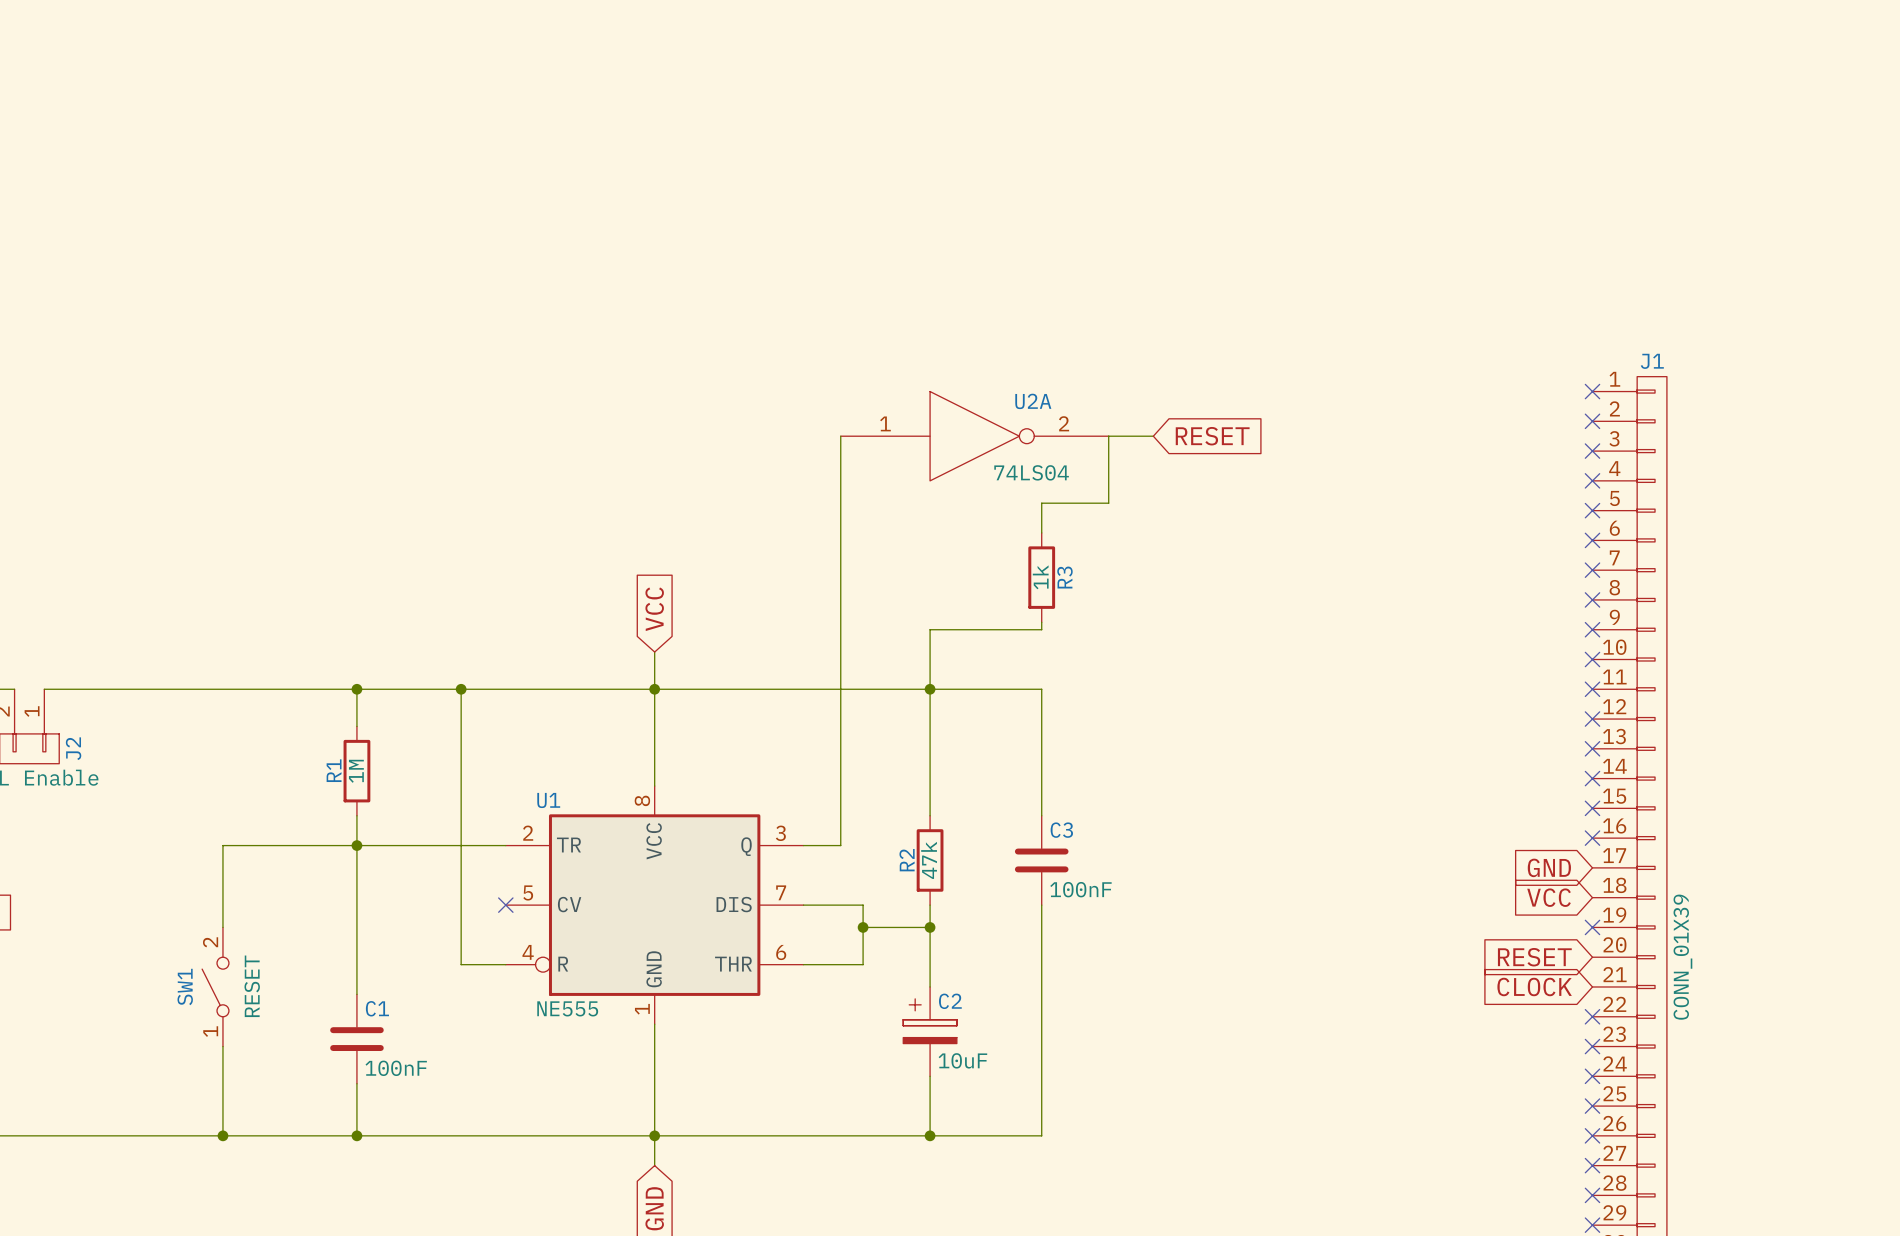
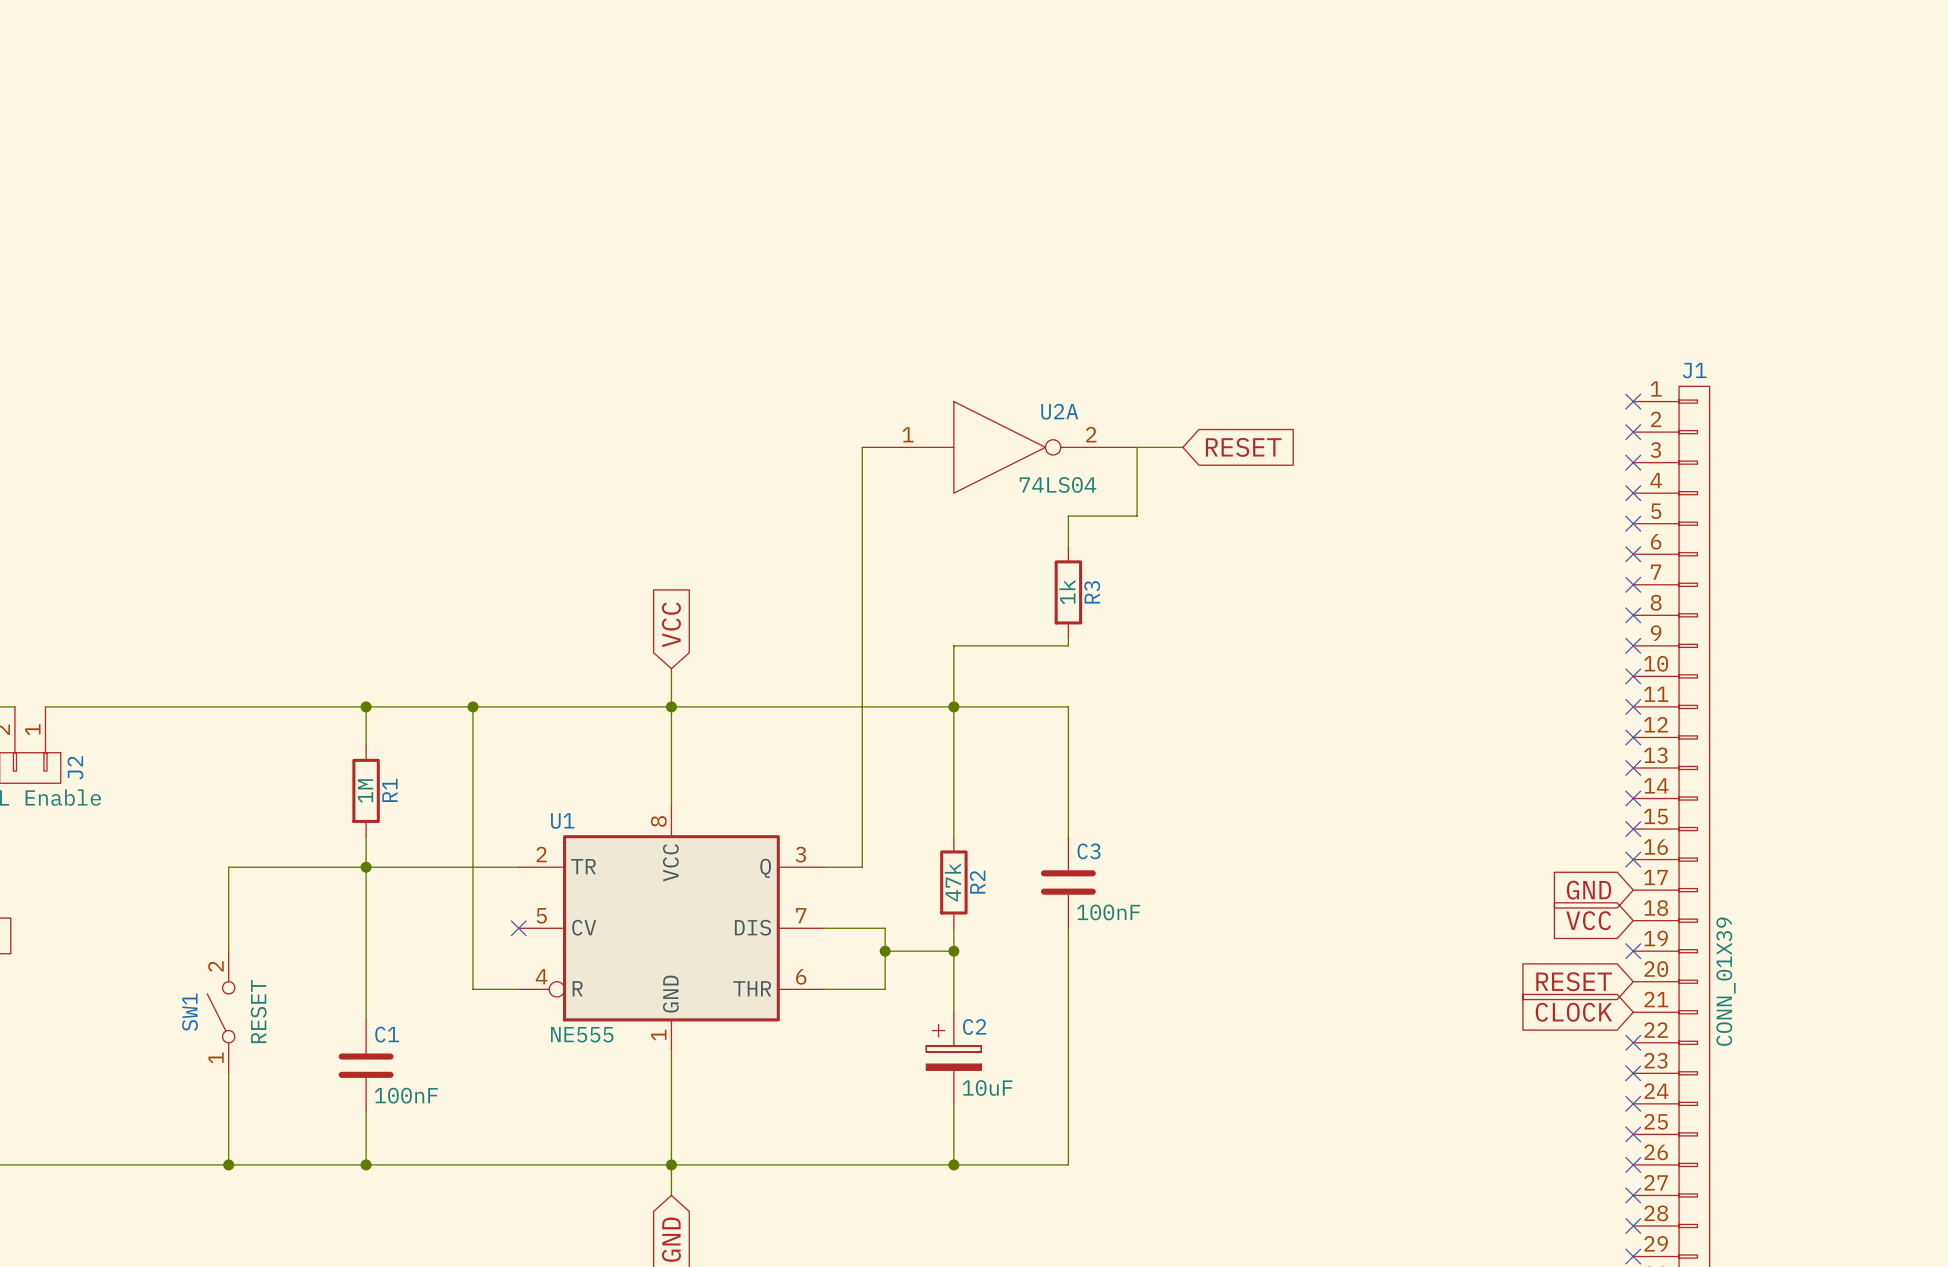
R1 name position: R1 (334, 770) -> R1 (389, 790)
R2 name position: R2 (907, 860) -> R2 (977, 882)

